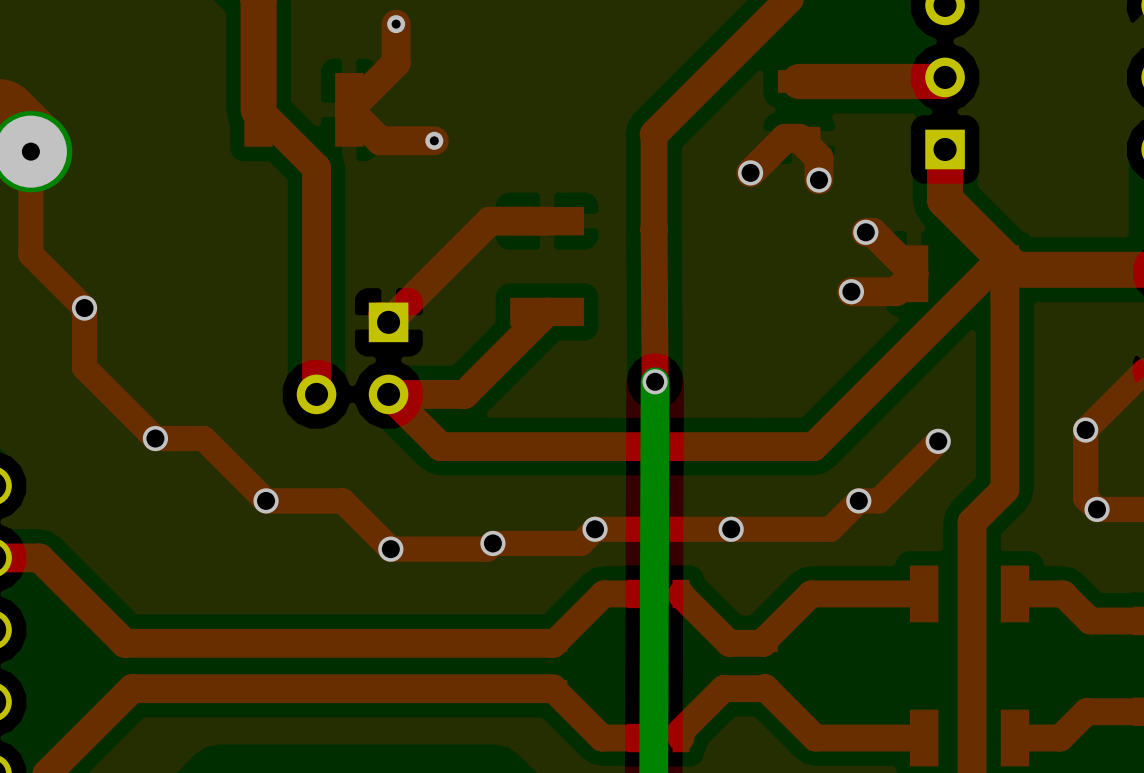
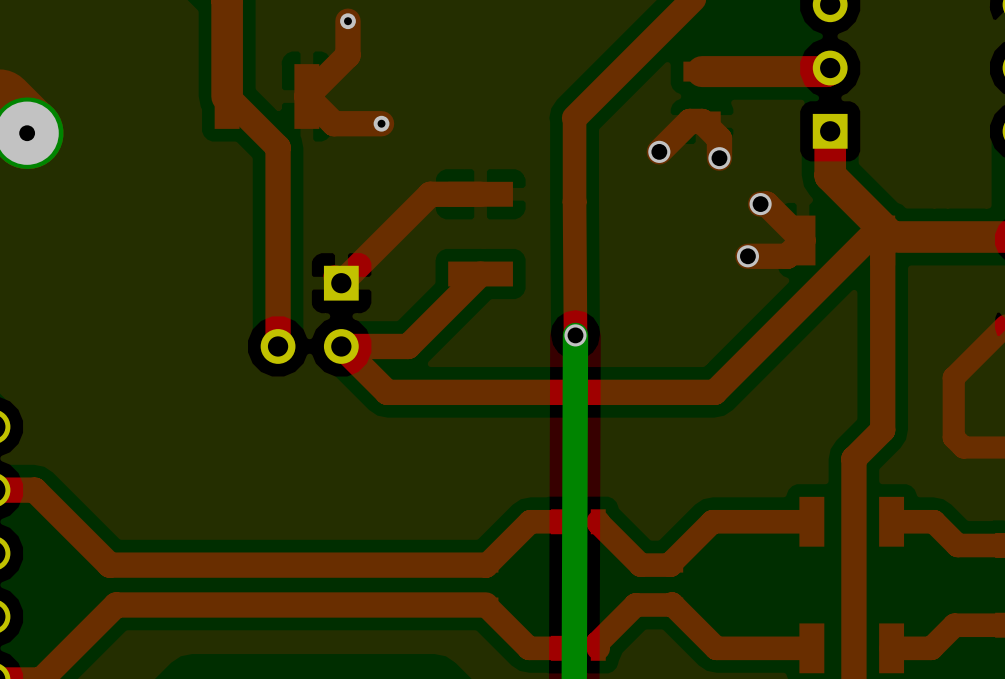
top track: (30, 151) (30, 254) (84, 308) (84, 367) (155, 438) (203, 438) (266, 500) (342, 500) (390, 549) (487, 549) (492, 543) (580, 543) (595, 529) (830, 529) (858, 500) (878, 500) (938, 441) -> none
via: (84, 308) -> none
via: (1085, 430) -> none
via: (155, 438) -> none
via: (938, 441) -> none
via: (266, 500) -> none
via: (858, 500) -> none
via: (1097, 509) -> none
via: (595, 529) -> none
via: (731, 529) -> none
via: (492, 543) -> none
via: (390, 549) -> none

